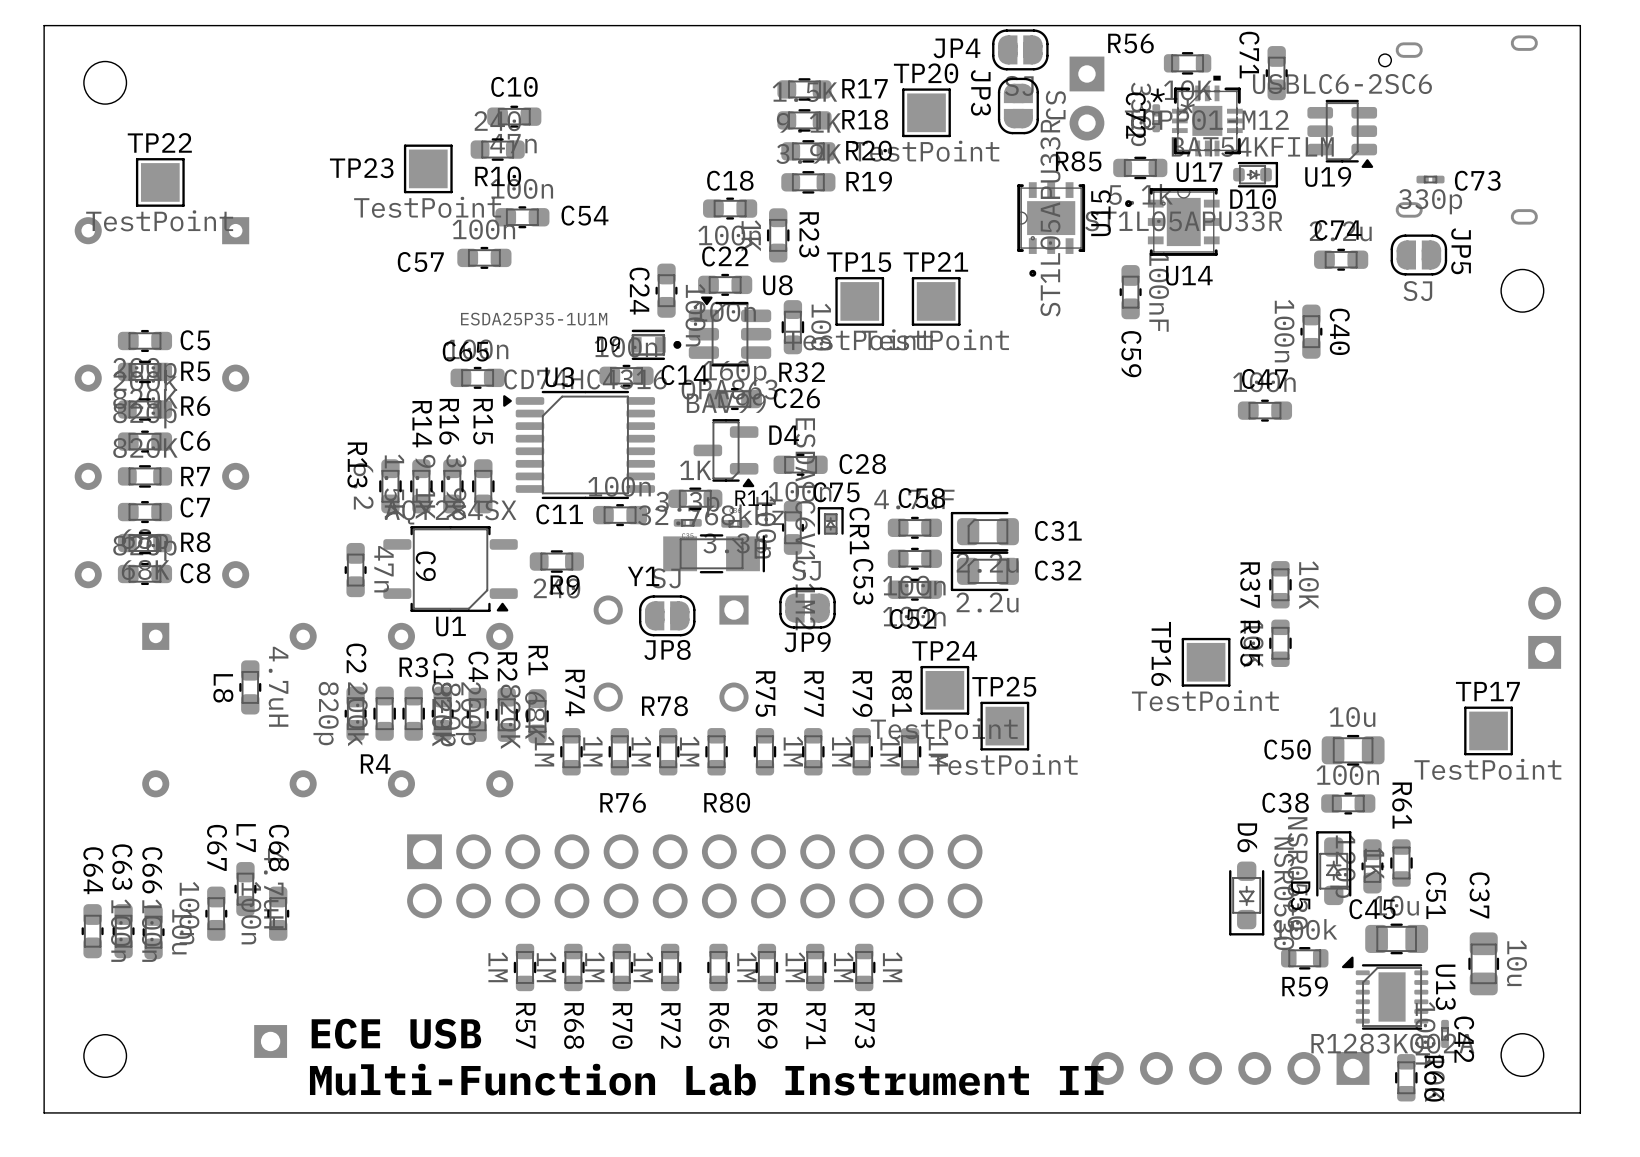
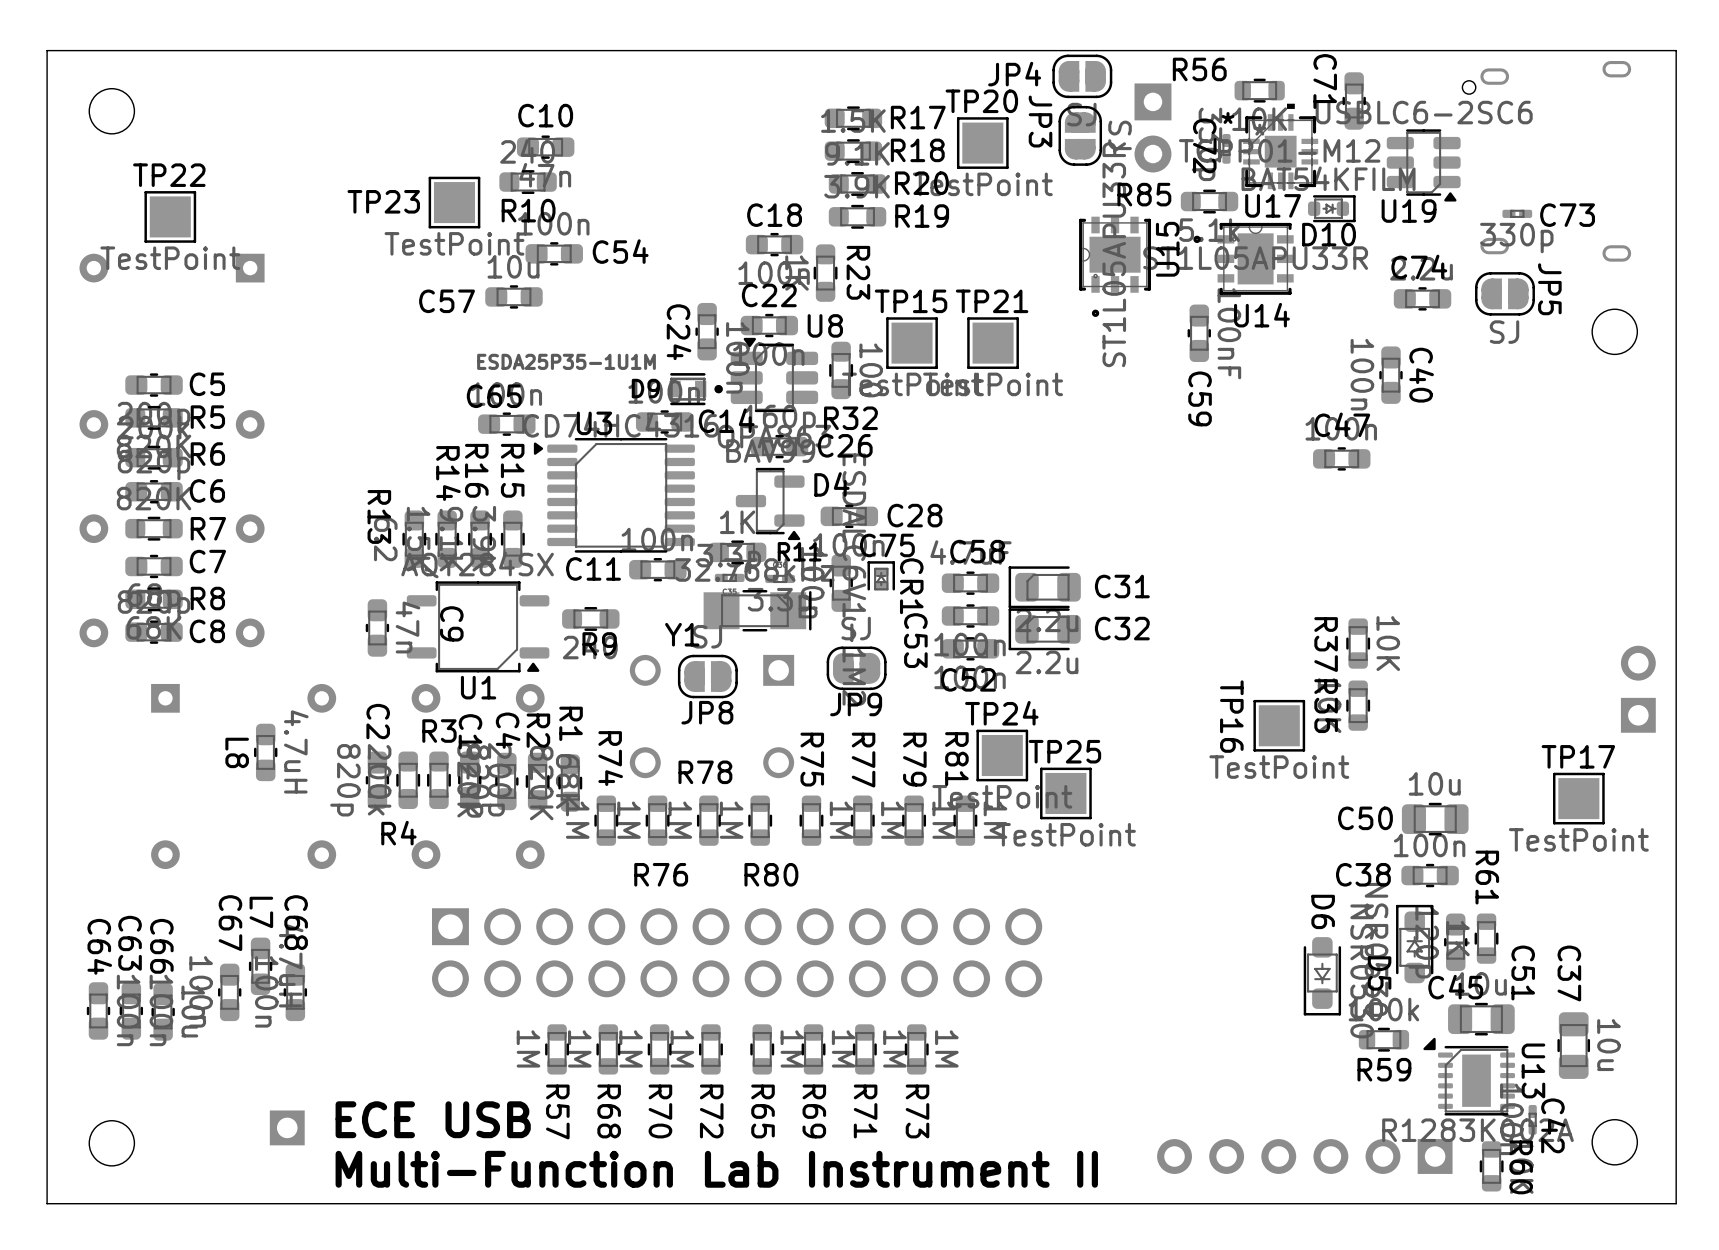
C57 value: 100n (483, 229) -> 10u (513, 266)

